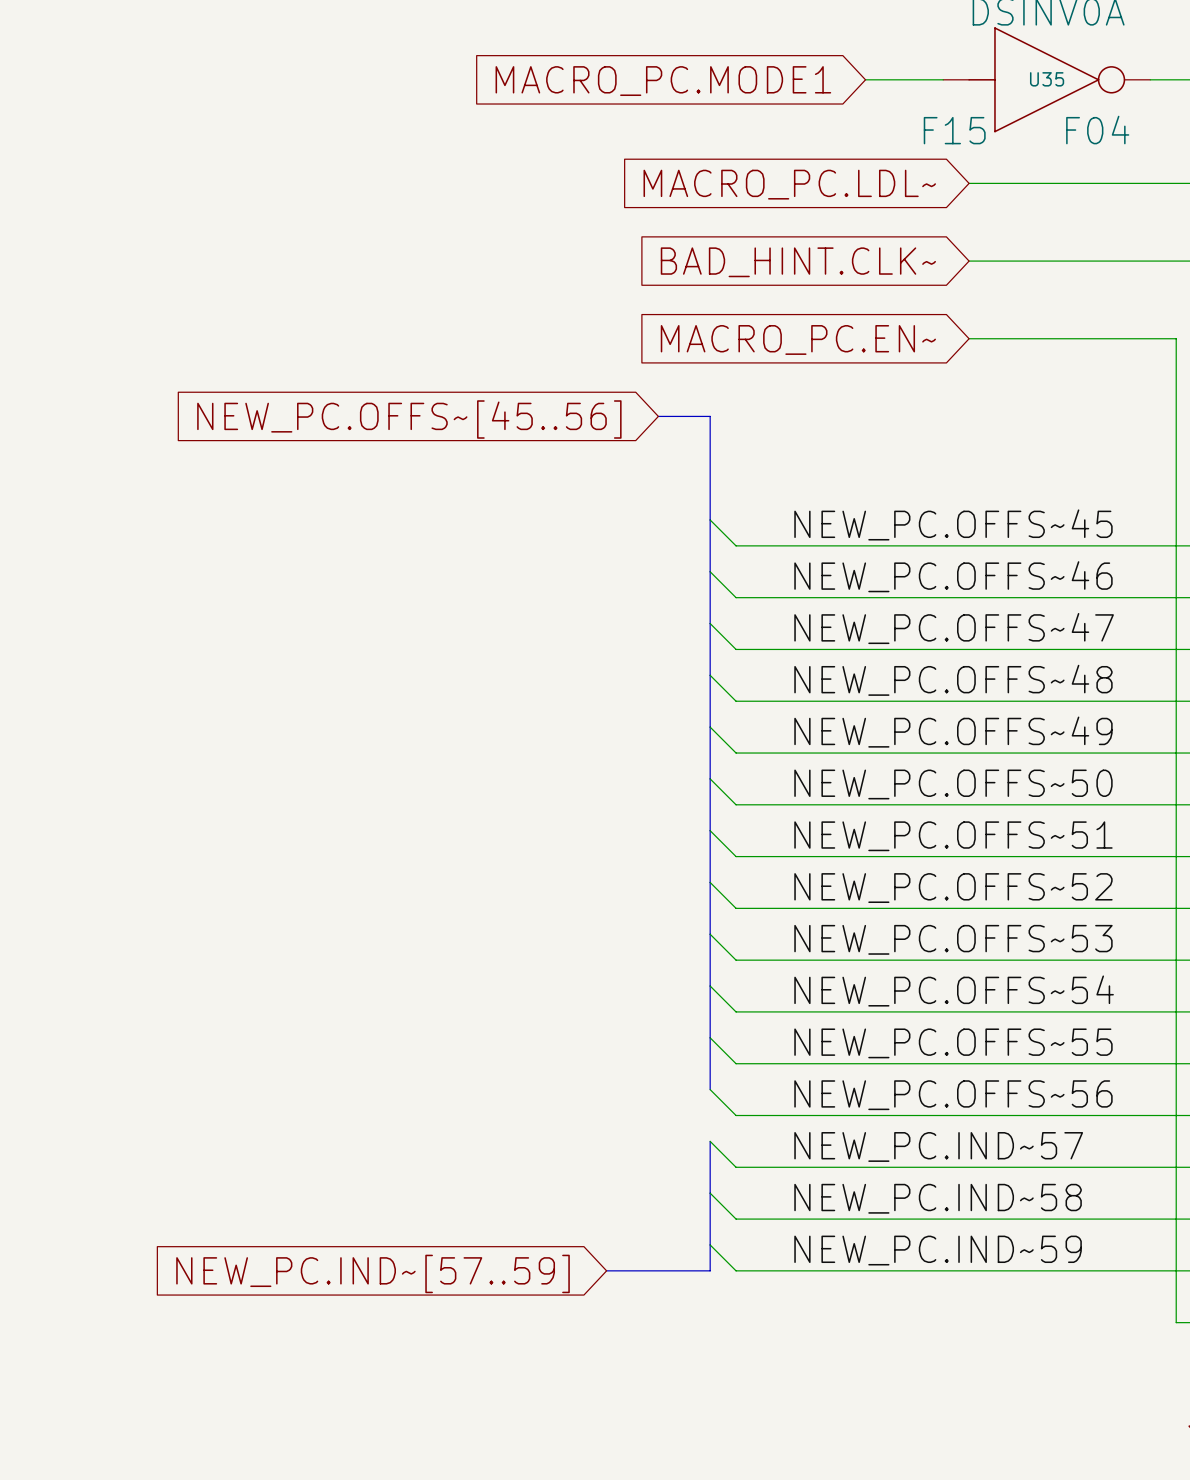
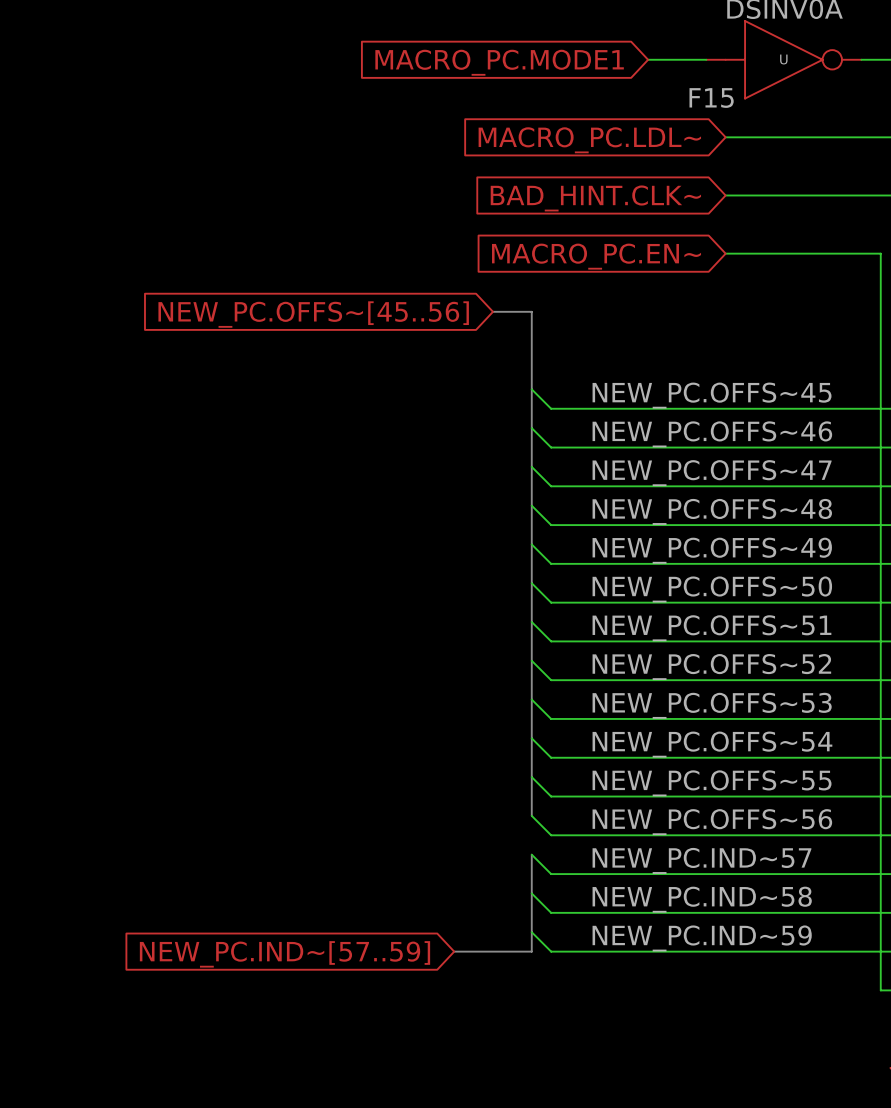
U35 name: U35 (1047, 79) -> U (783, 59)
U35 value: F04 (1097, 130) -> none

